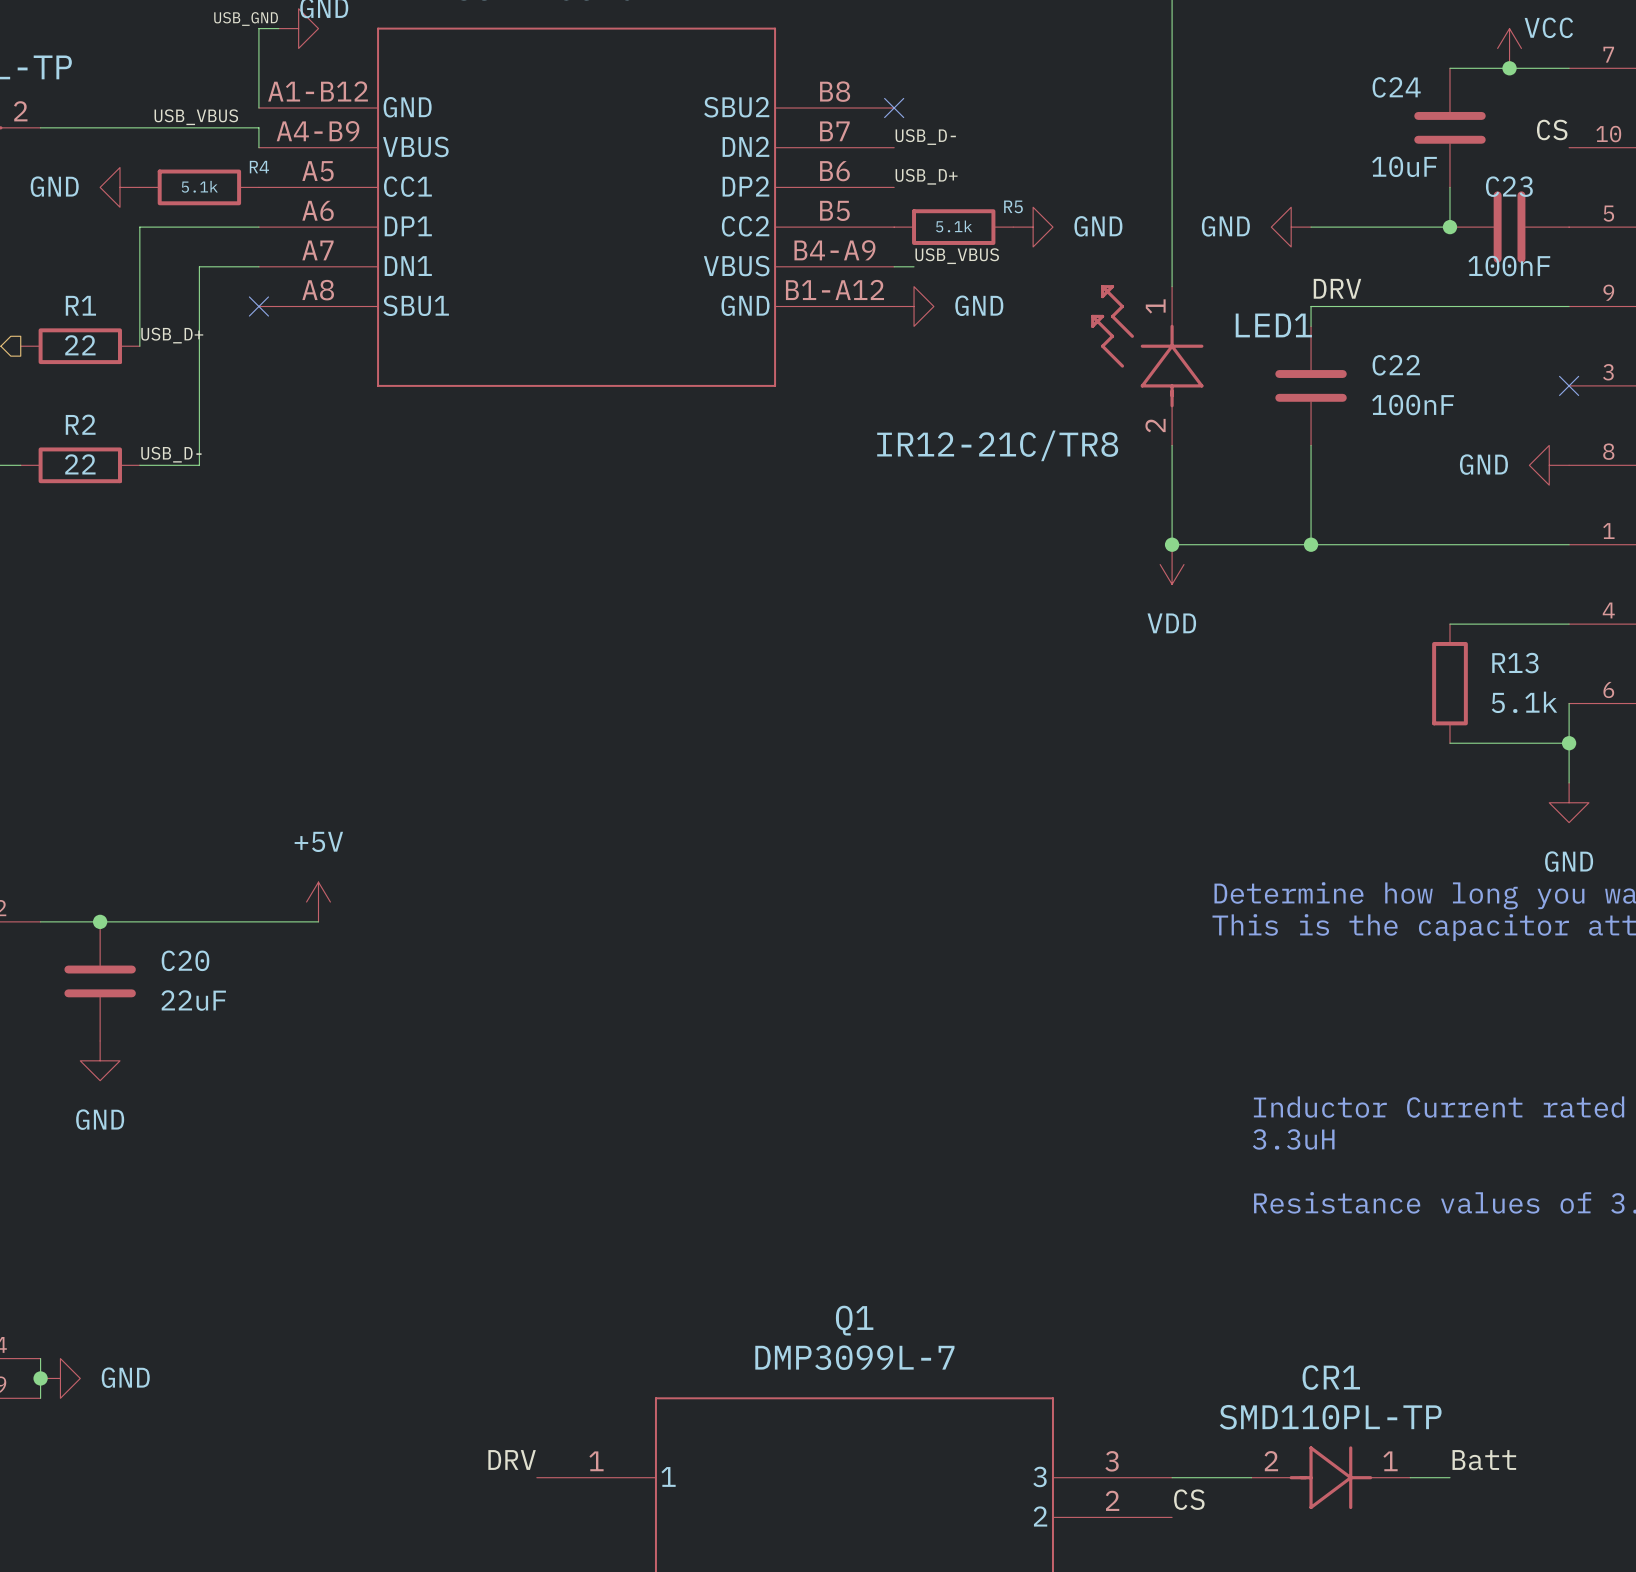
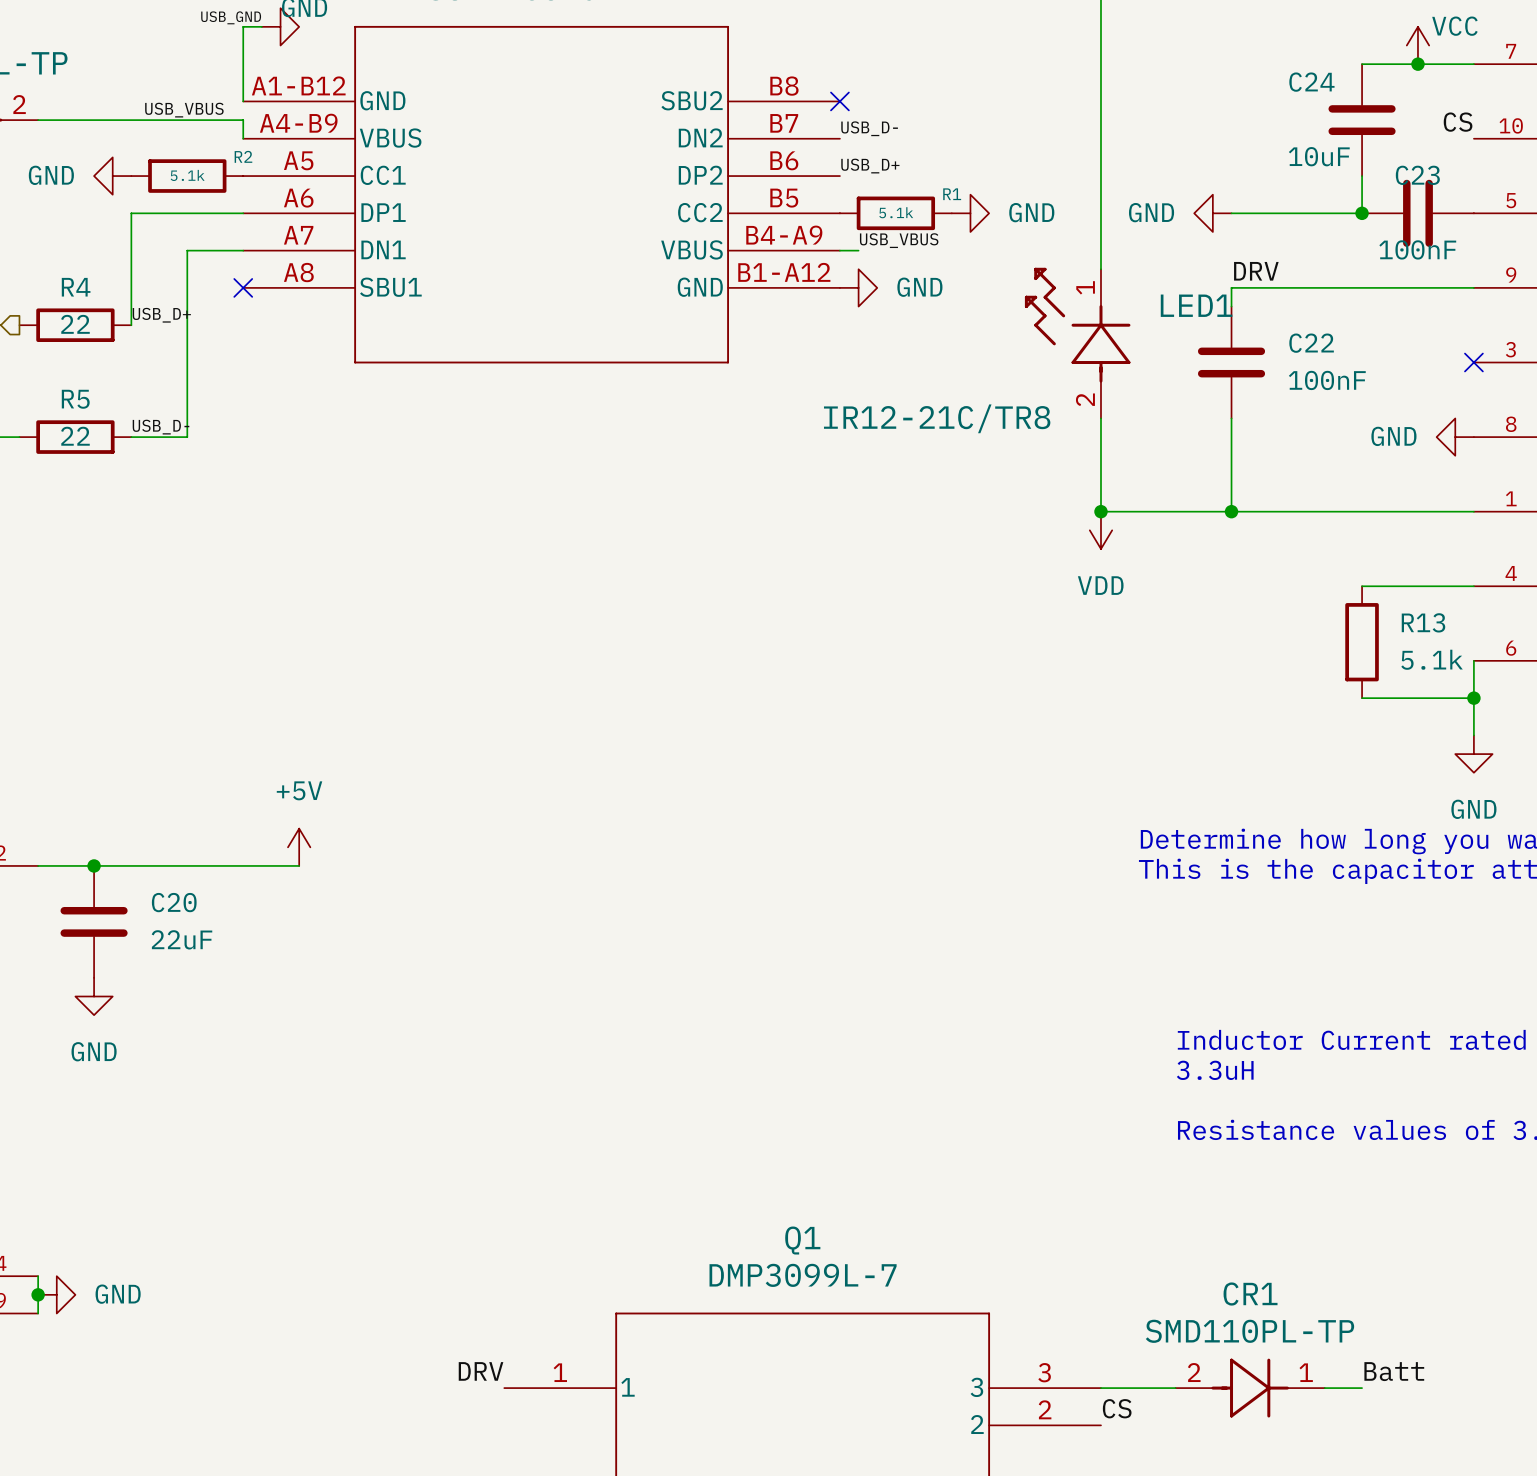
R4 name: R4 (259, 167) -> R2 (243, 156)
R5 name: R5 (1013, 206) -> R1 (952, 194)
R1 name: R1 (80, 305) -> R4 (76, 287)
R2 name: R2 (80, 424) -> R5 (75, 399)

